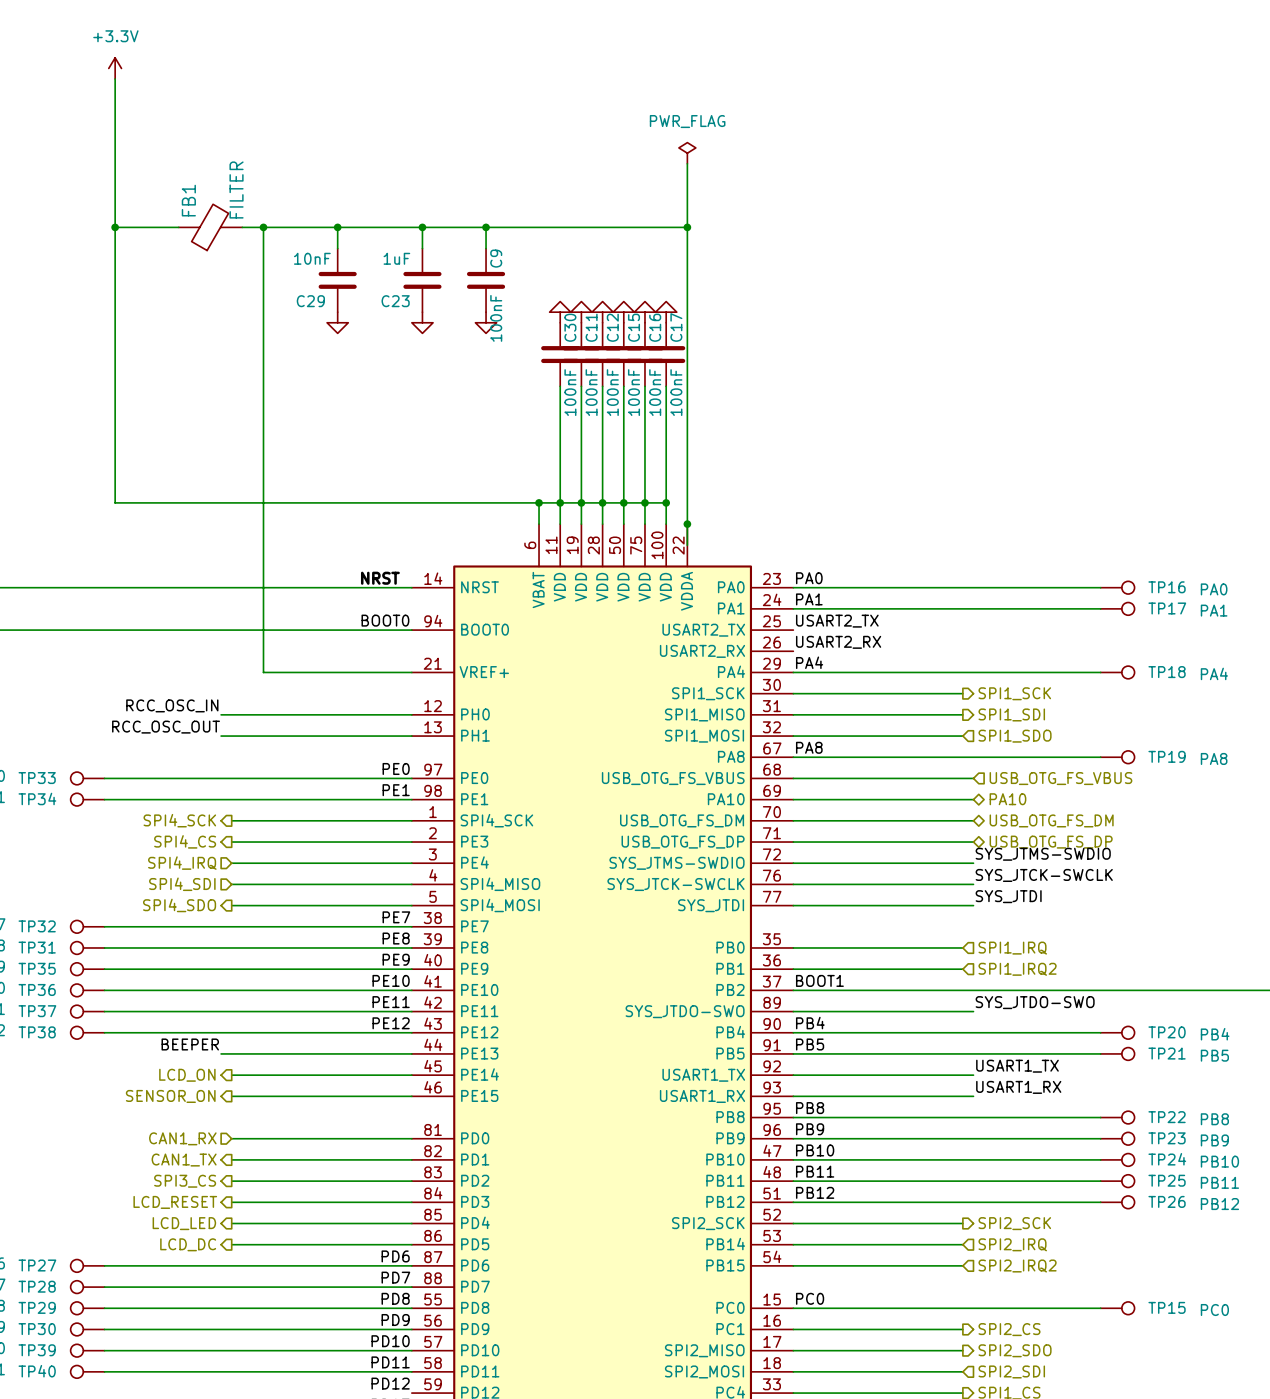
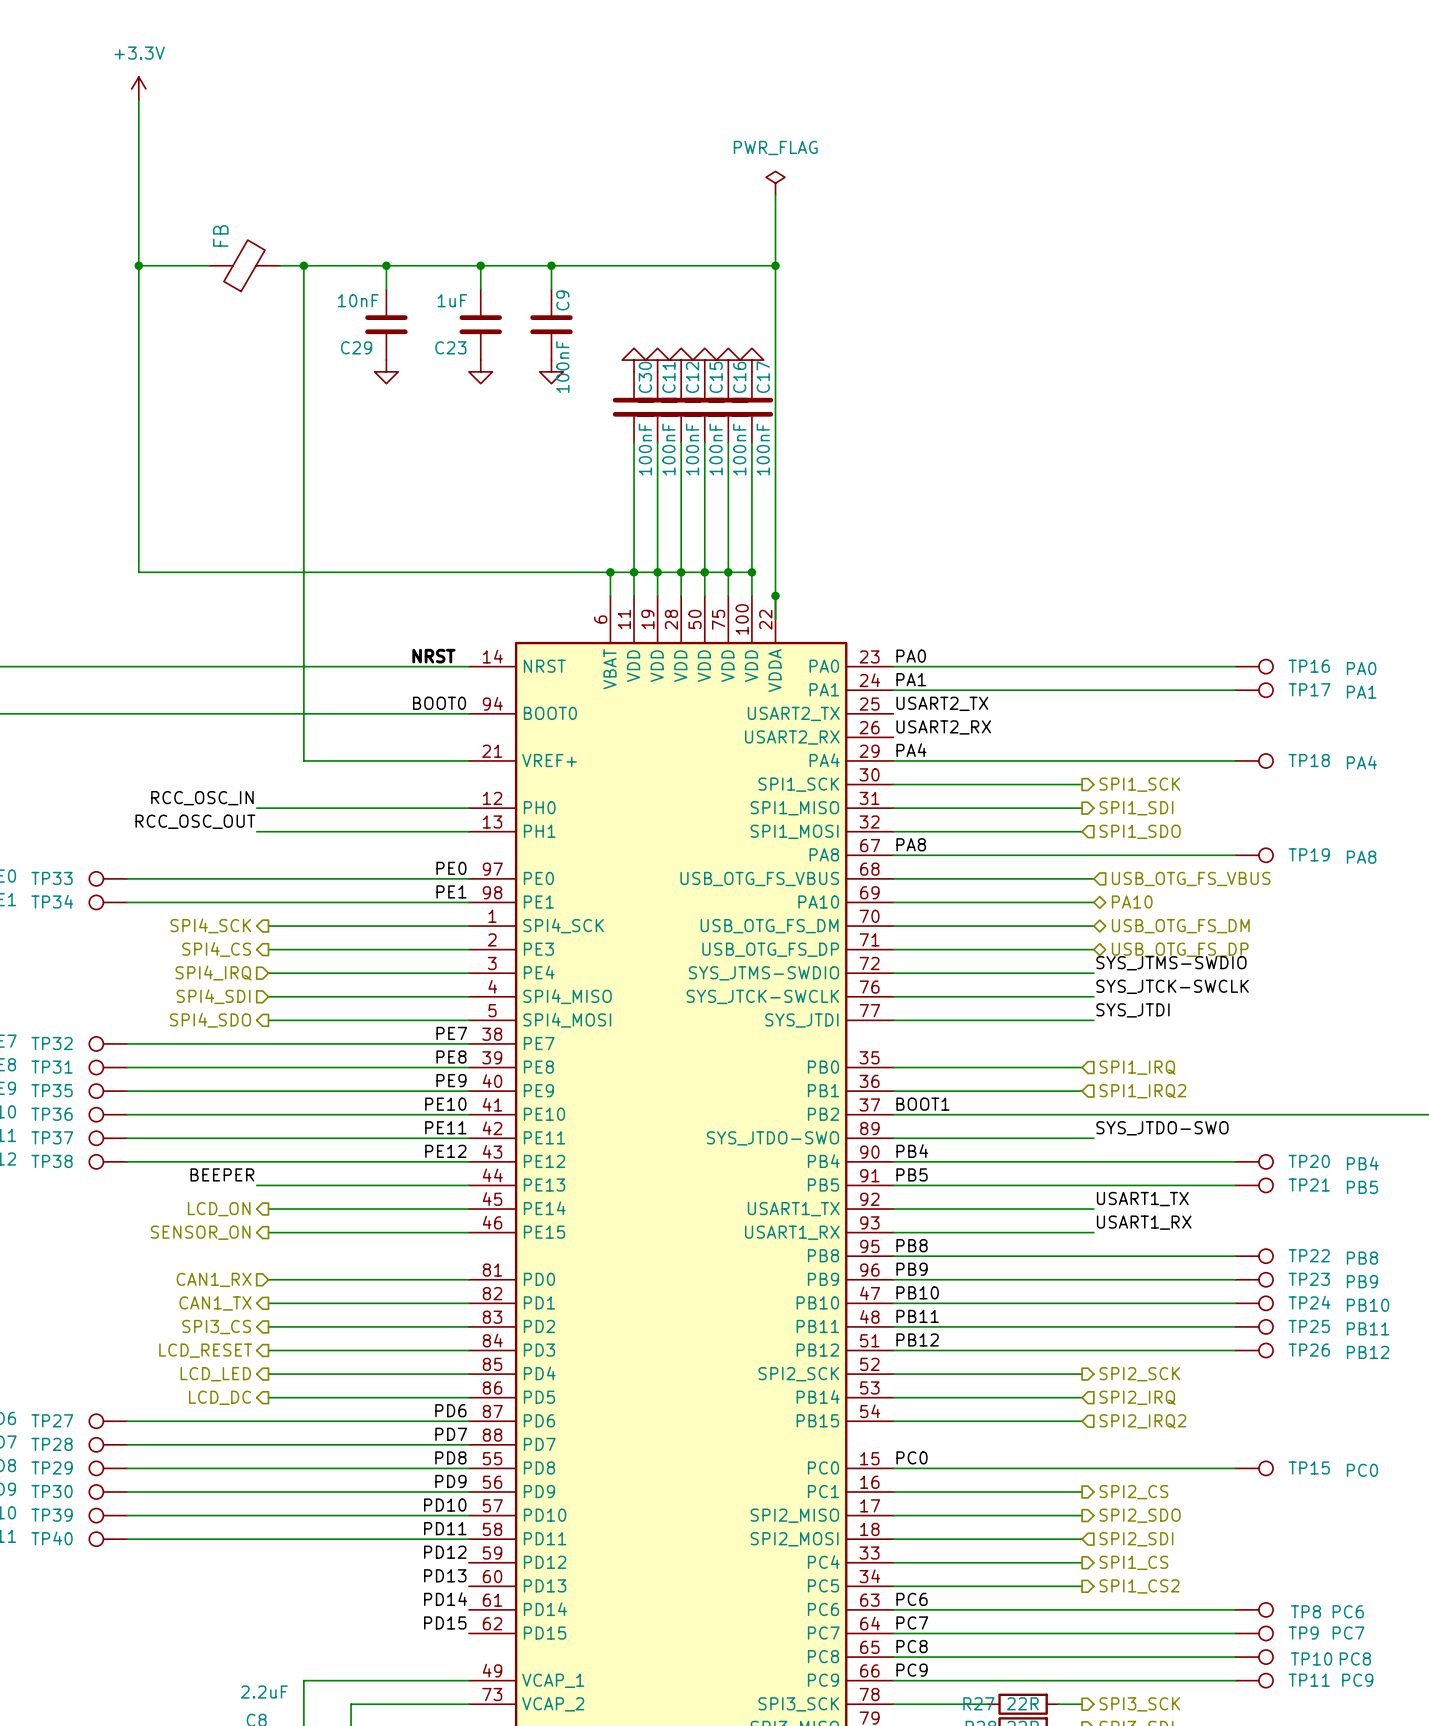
FB1 value: FILTER (236, 190) -> none
FB1 name: FB1 (188, 200) -> FB (220, 235)

